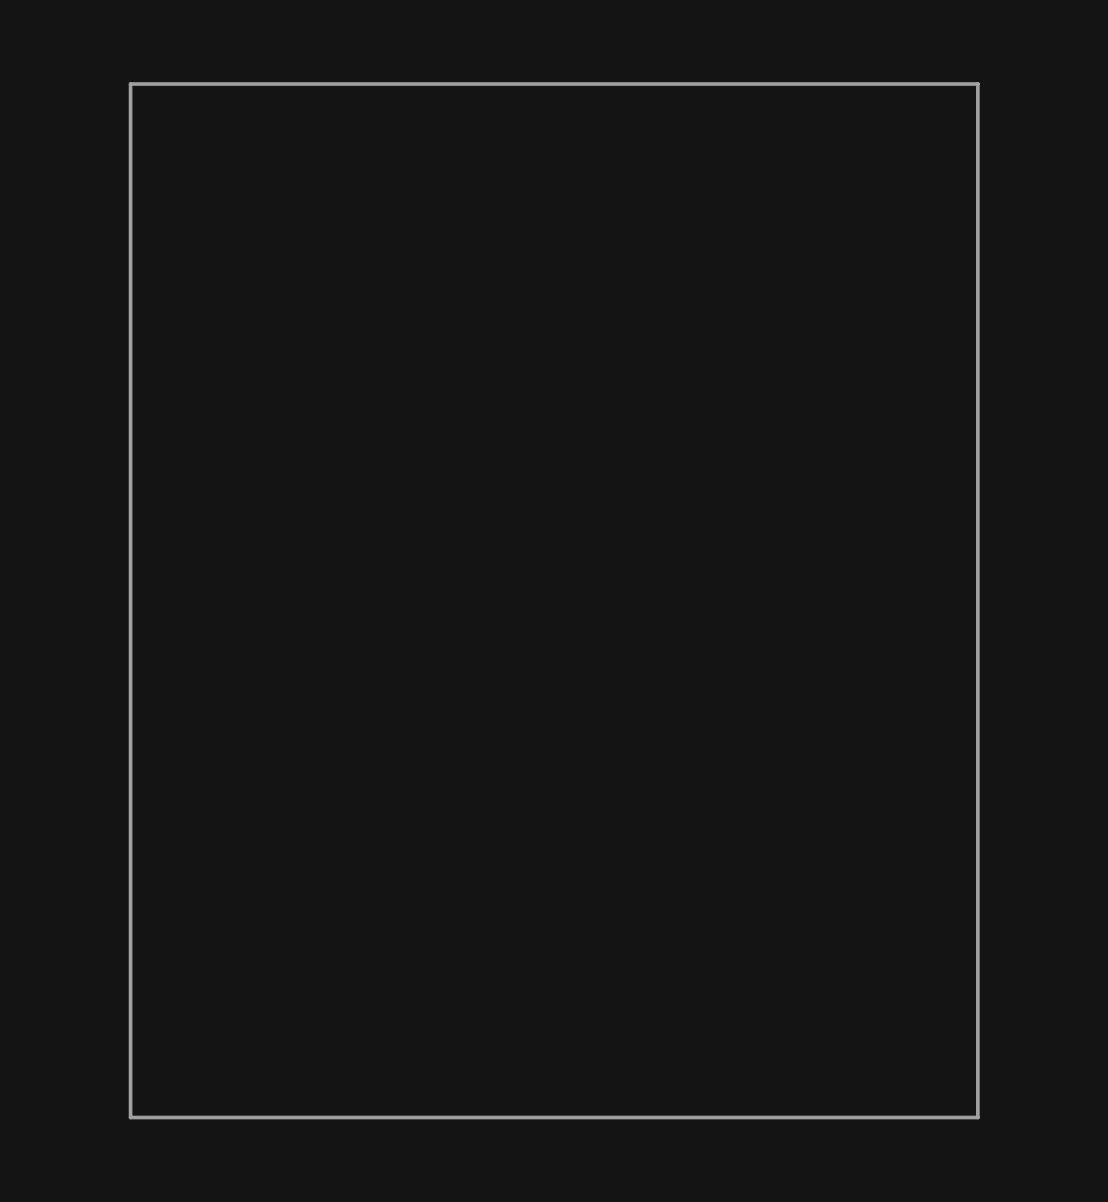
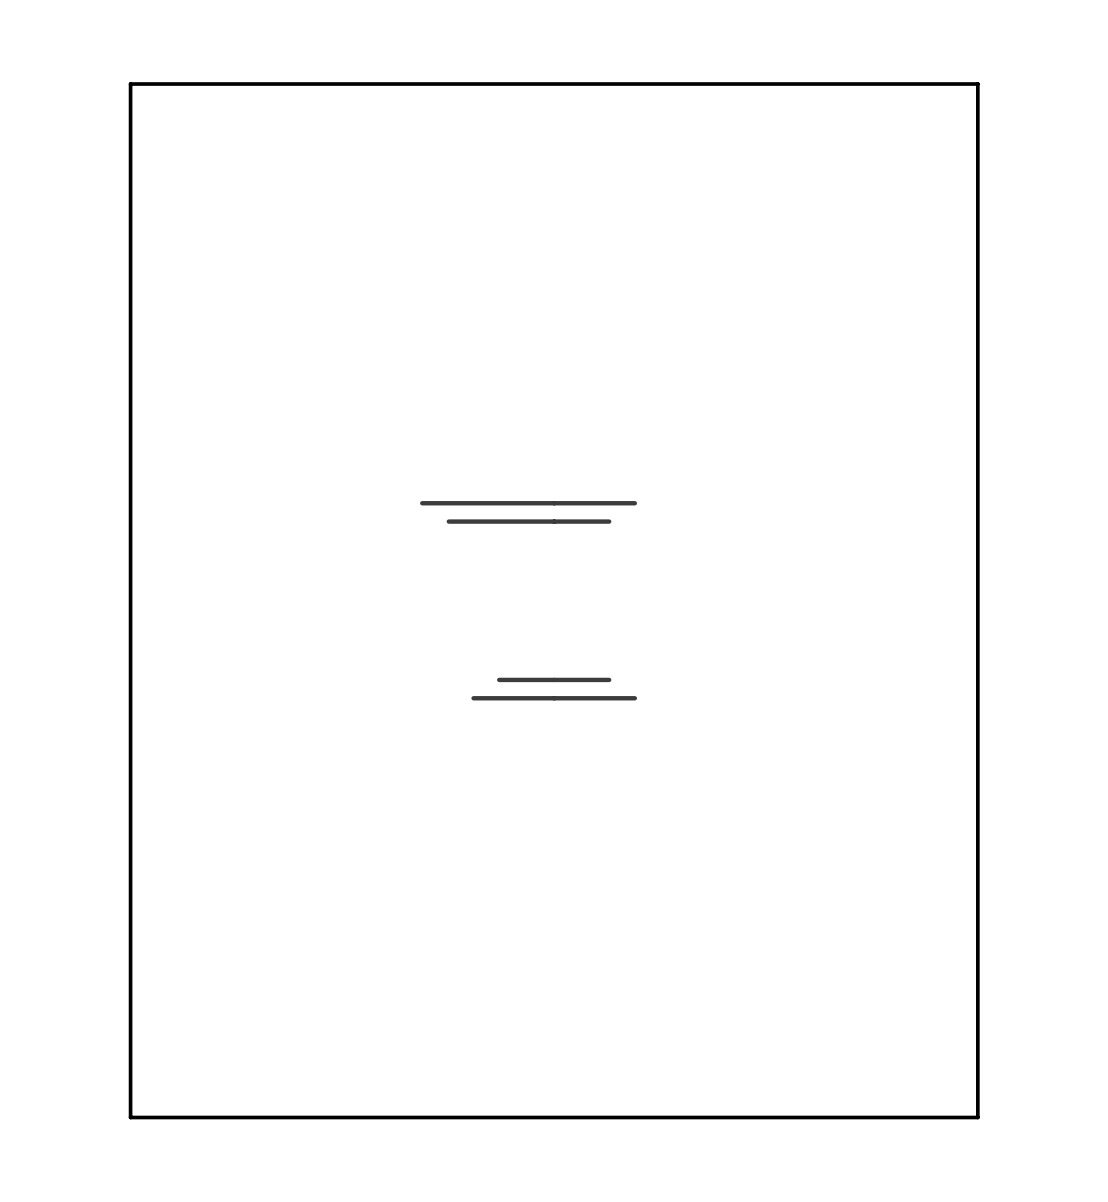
drawing: none -> [420, 501, 638, 701]

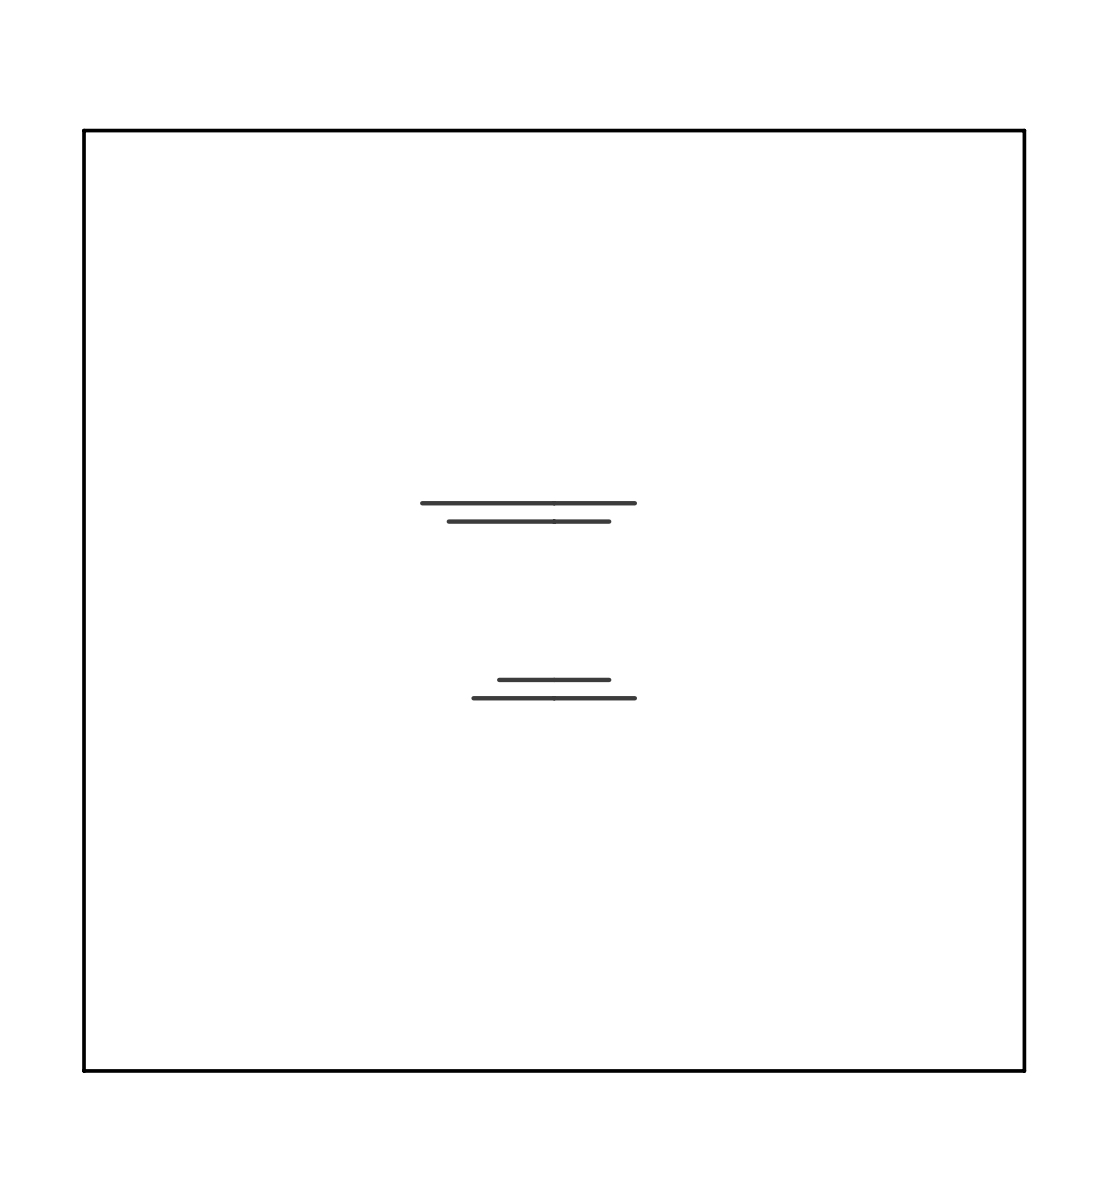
board edge: (977, 84) (130, 84) (130, 1117) (977, 1117) (977, 84) -> (1024, 130) (1024, 1070) (84, 1070) (84, 130) (1024, 130)

